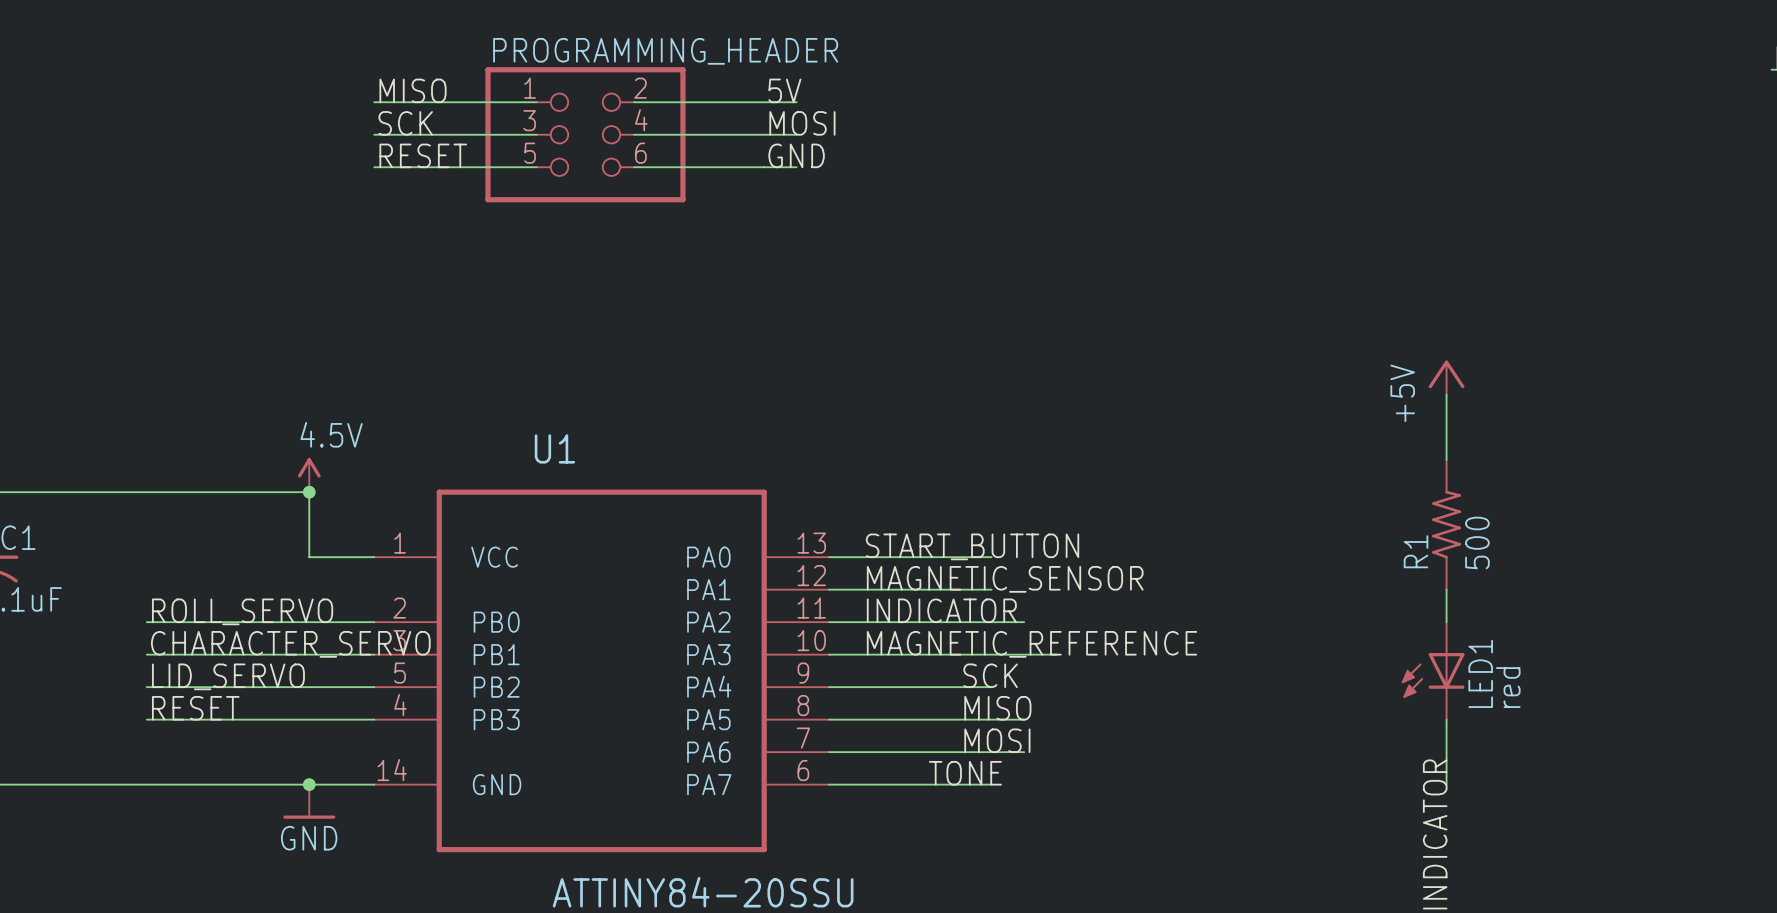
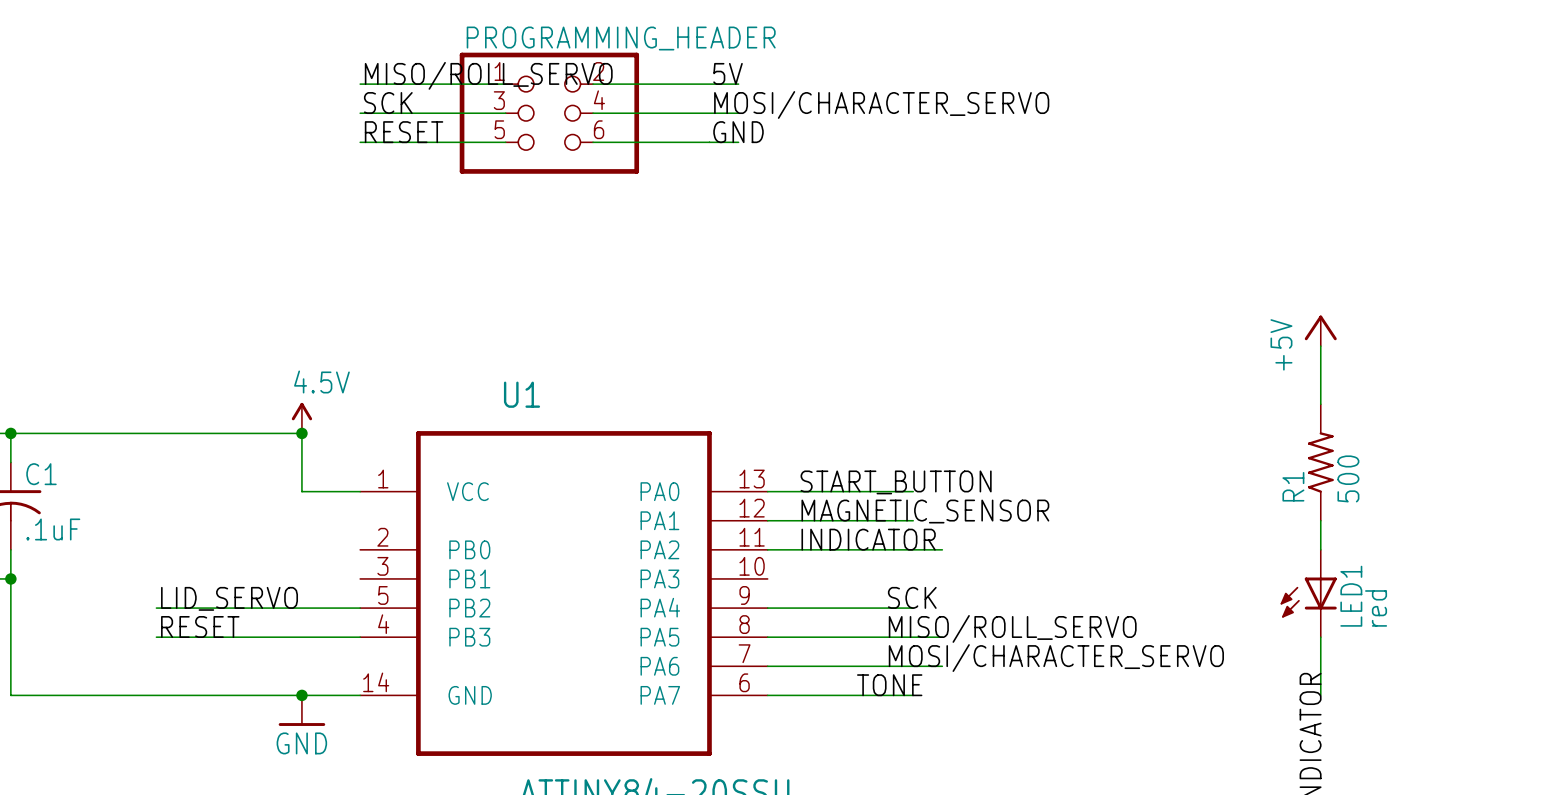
label: MISO (412, 90) -> MISO/ROLL_SERVO (488, 75)
label: MOSI (802, 123) -> MOSI/CHARACTER_SERVO (881, 104)
label: ROLL_SERVO (242, 611) -> none
wire: (146, 622) (374, 622) -> none
label: CHARACTER_SERVO (290, 644) -> none
label: MAGNETIC_REFERENCE (1032, 644) -> none
wire: (146, 654) (374, 654) -> none
wire: (829, 654) (1056, 654) -> none
label: MISO (997, 708) -> MISO/ROLL_SERVO (1012, 628)
label: MOSI (997, 740) -> MOSI/CHARACTER_SERVO (1056, 658)

